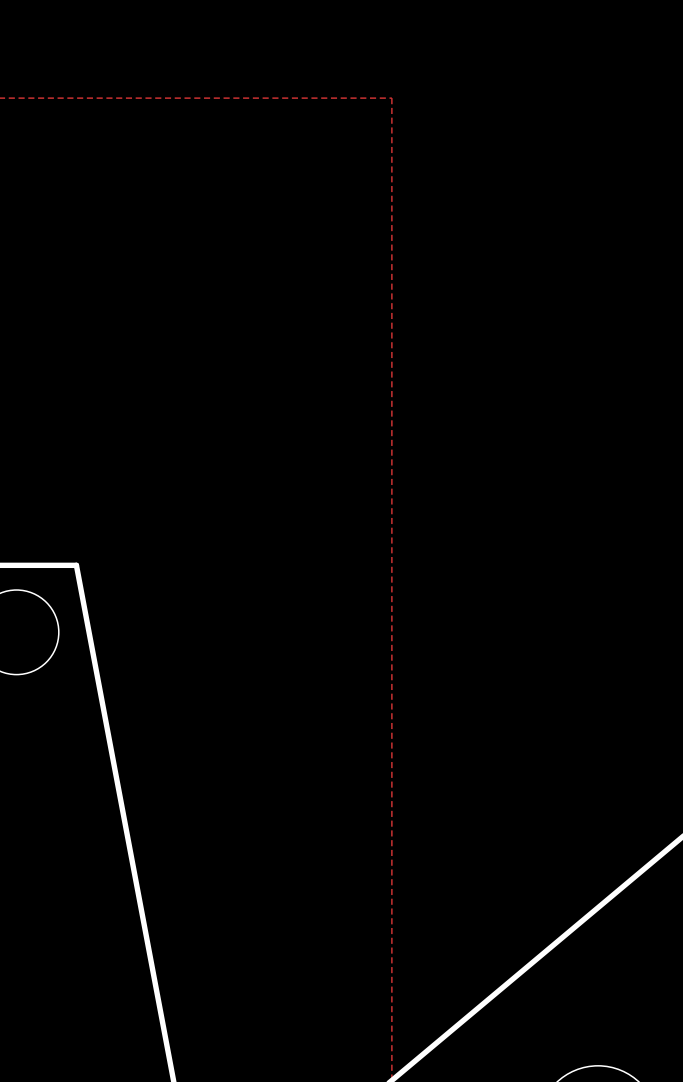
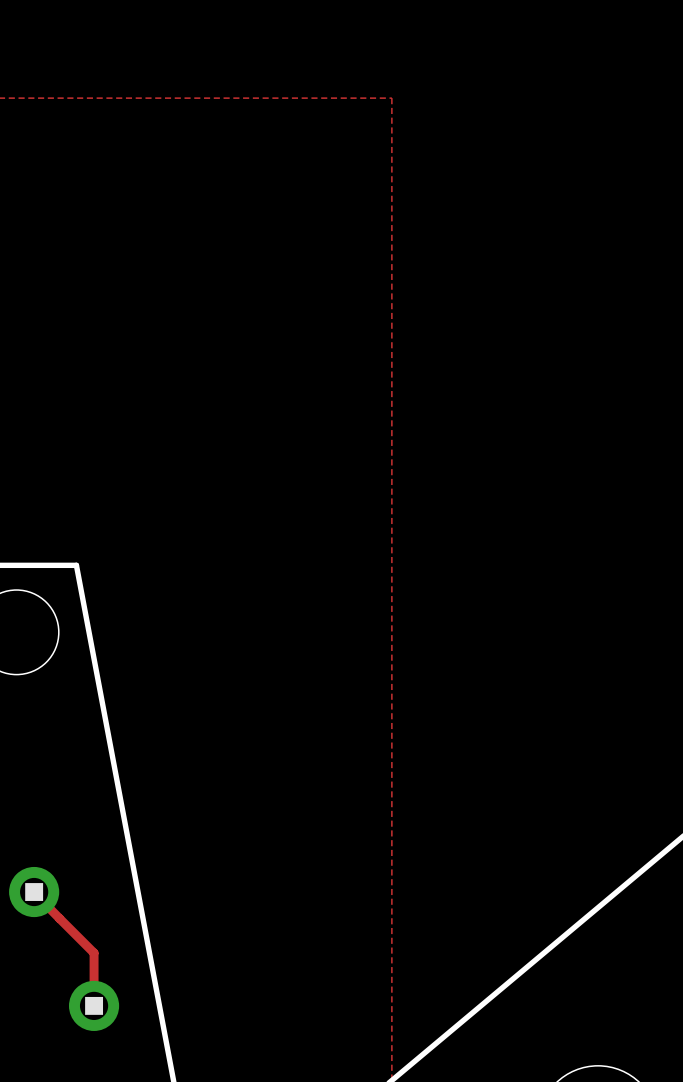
top track: none -> (34, 892) (94, 953) (94, 1005)
part: none -> (34, 892)
part: none -> (94, 1005)

